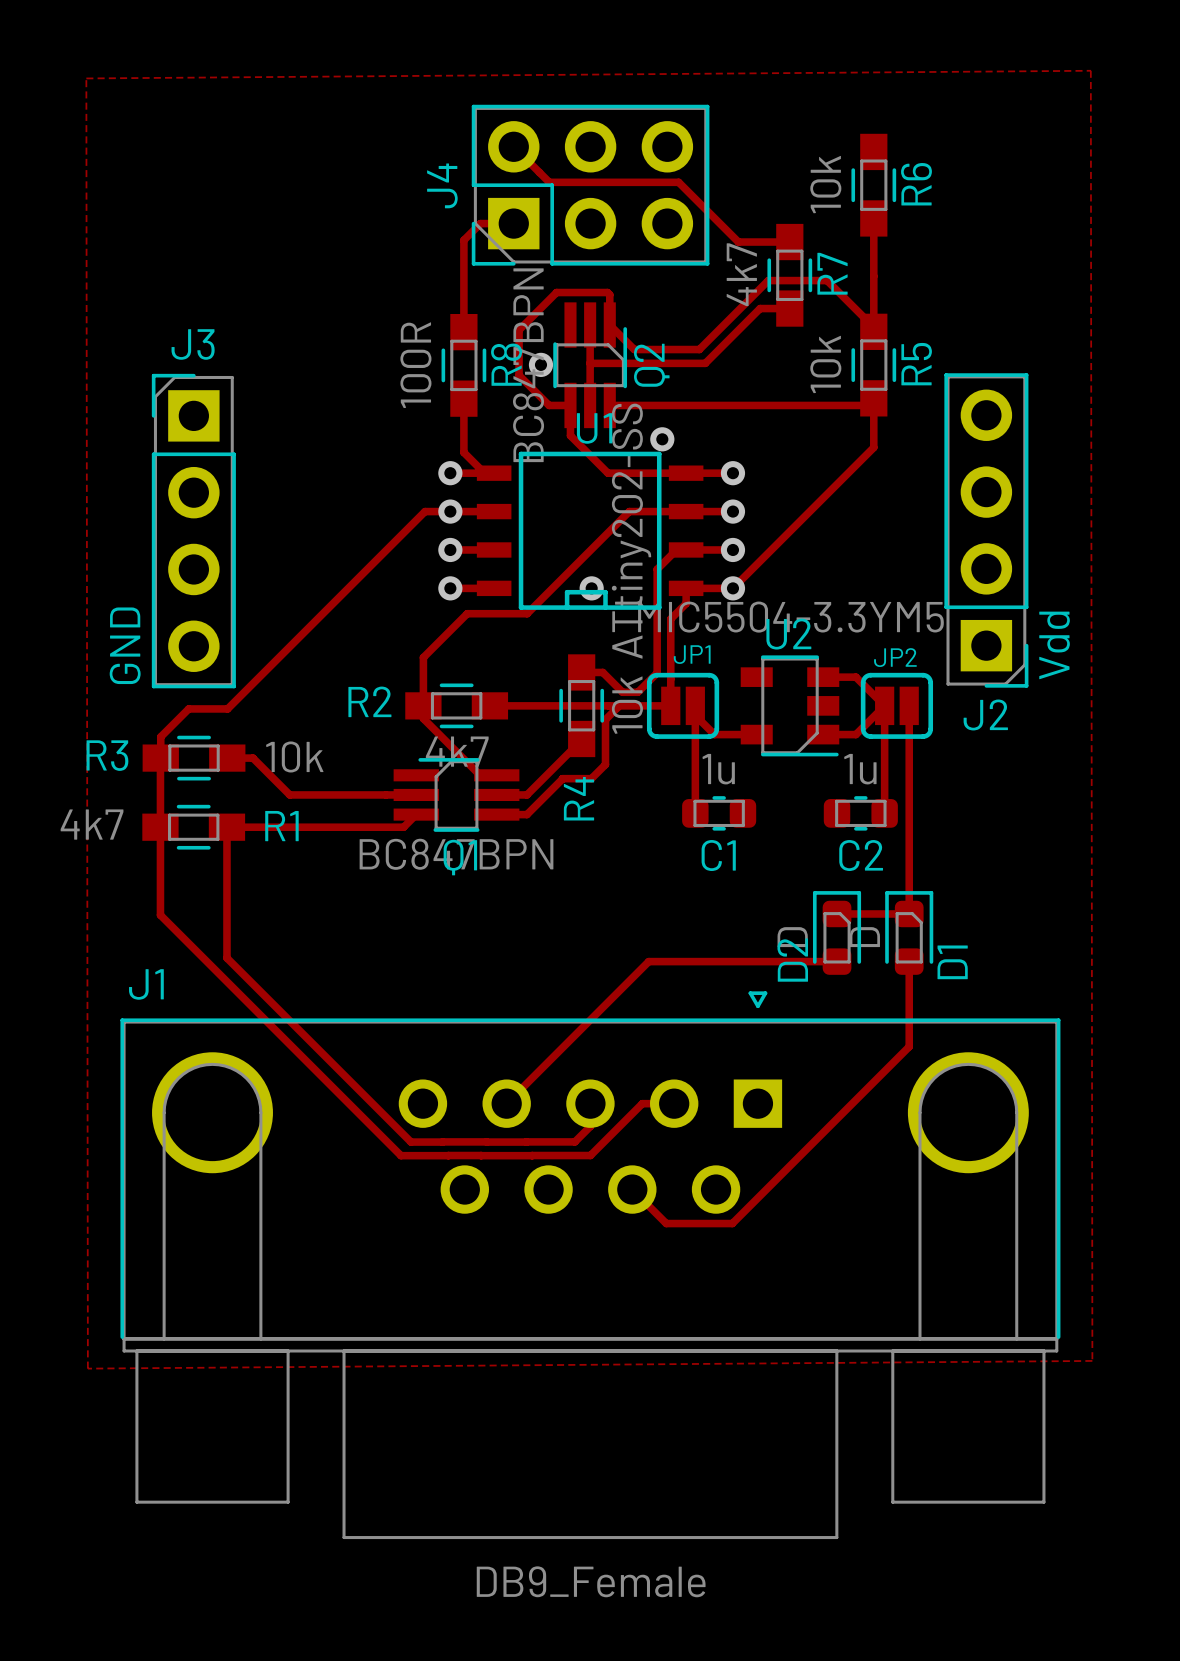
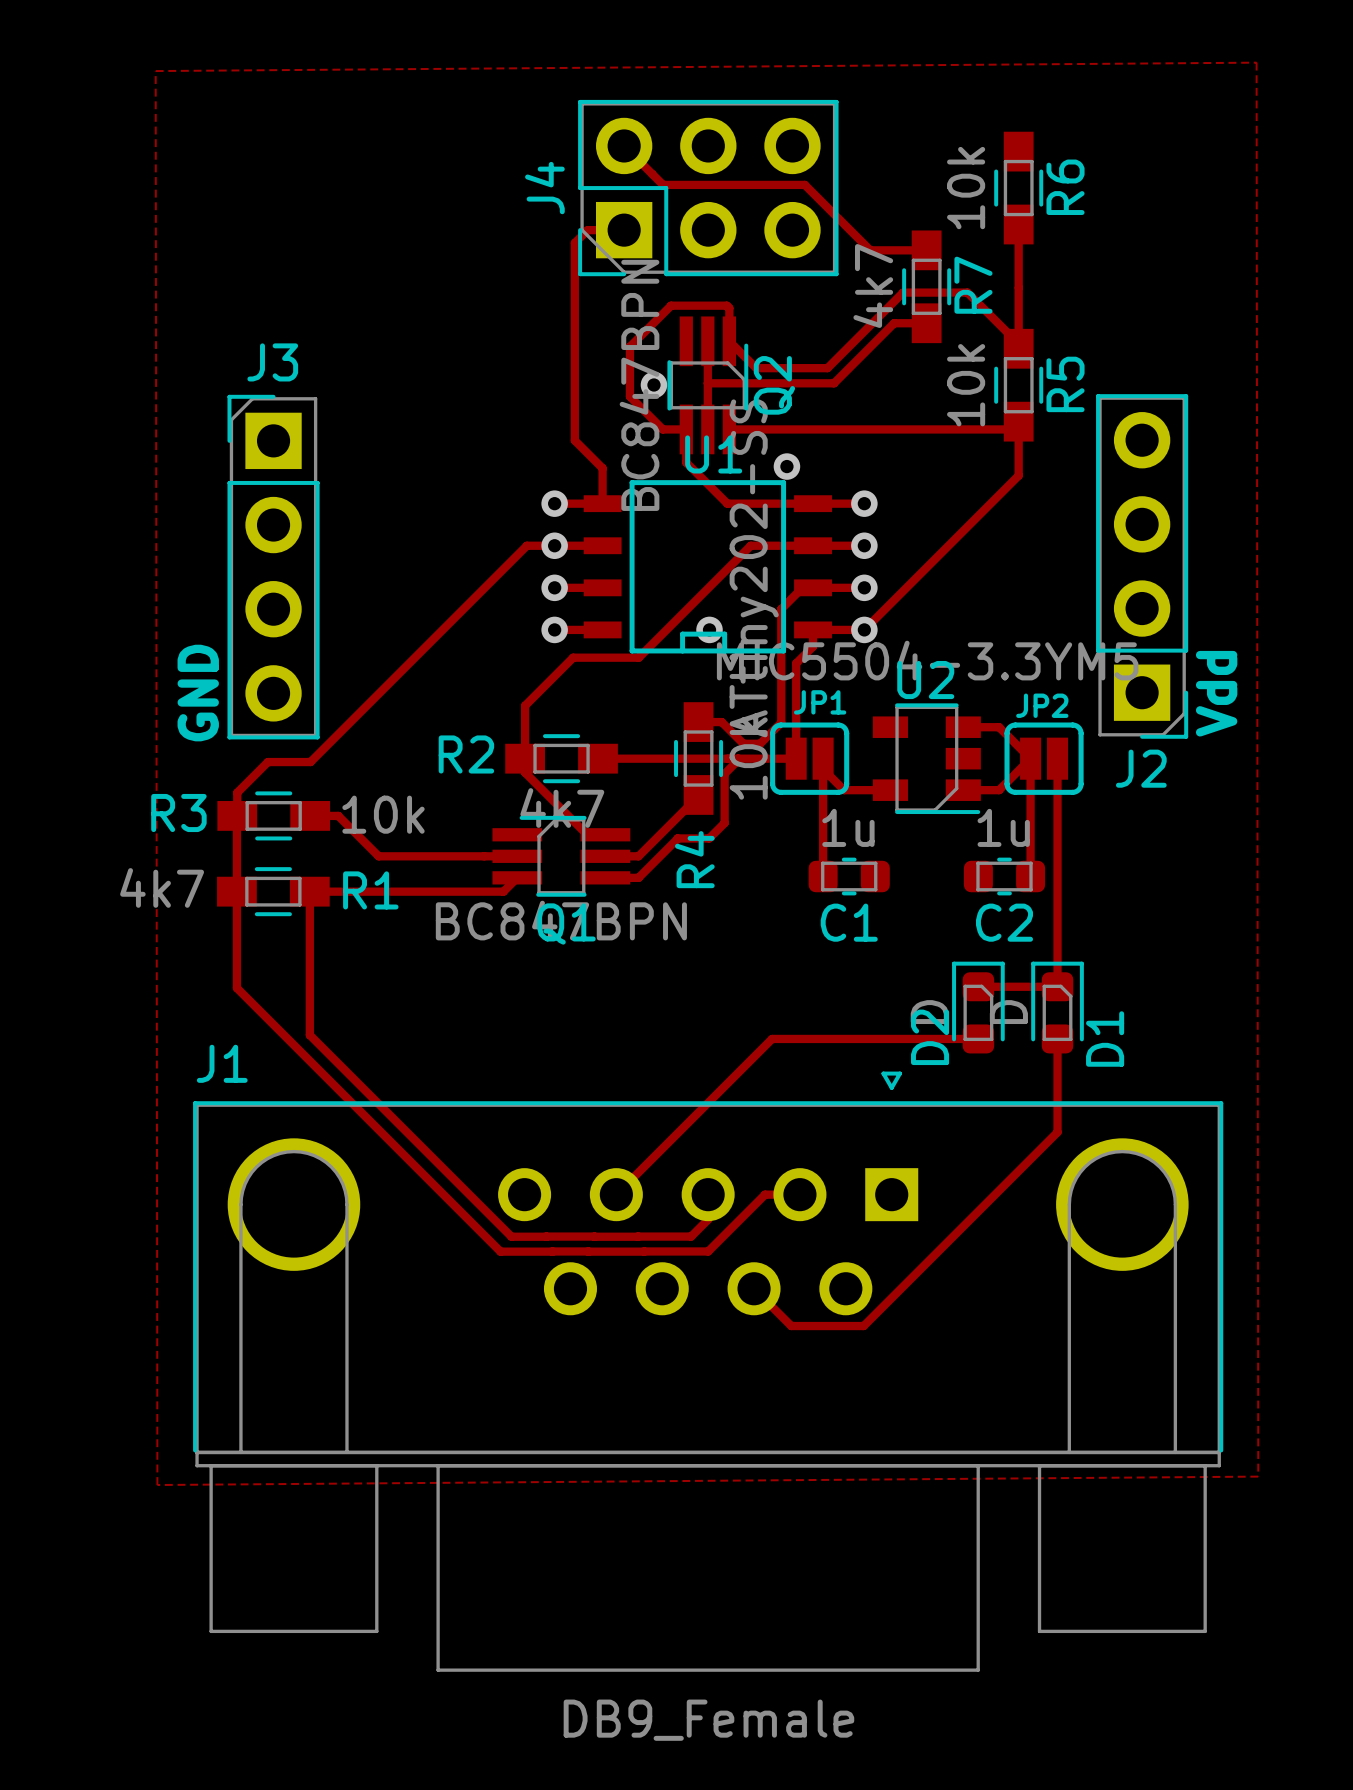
track: (468, 235) (463, 240) (463, 332) -> (574, 243) (574, 440) (602, 468) (602, 503)
R8: 100R (463, 365) -> none
track: (463, 398) (463, 452) (484, 473) -> none

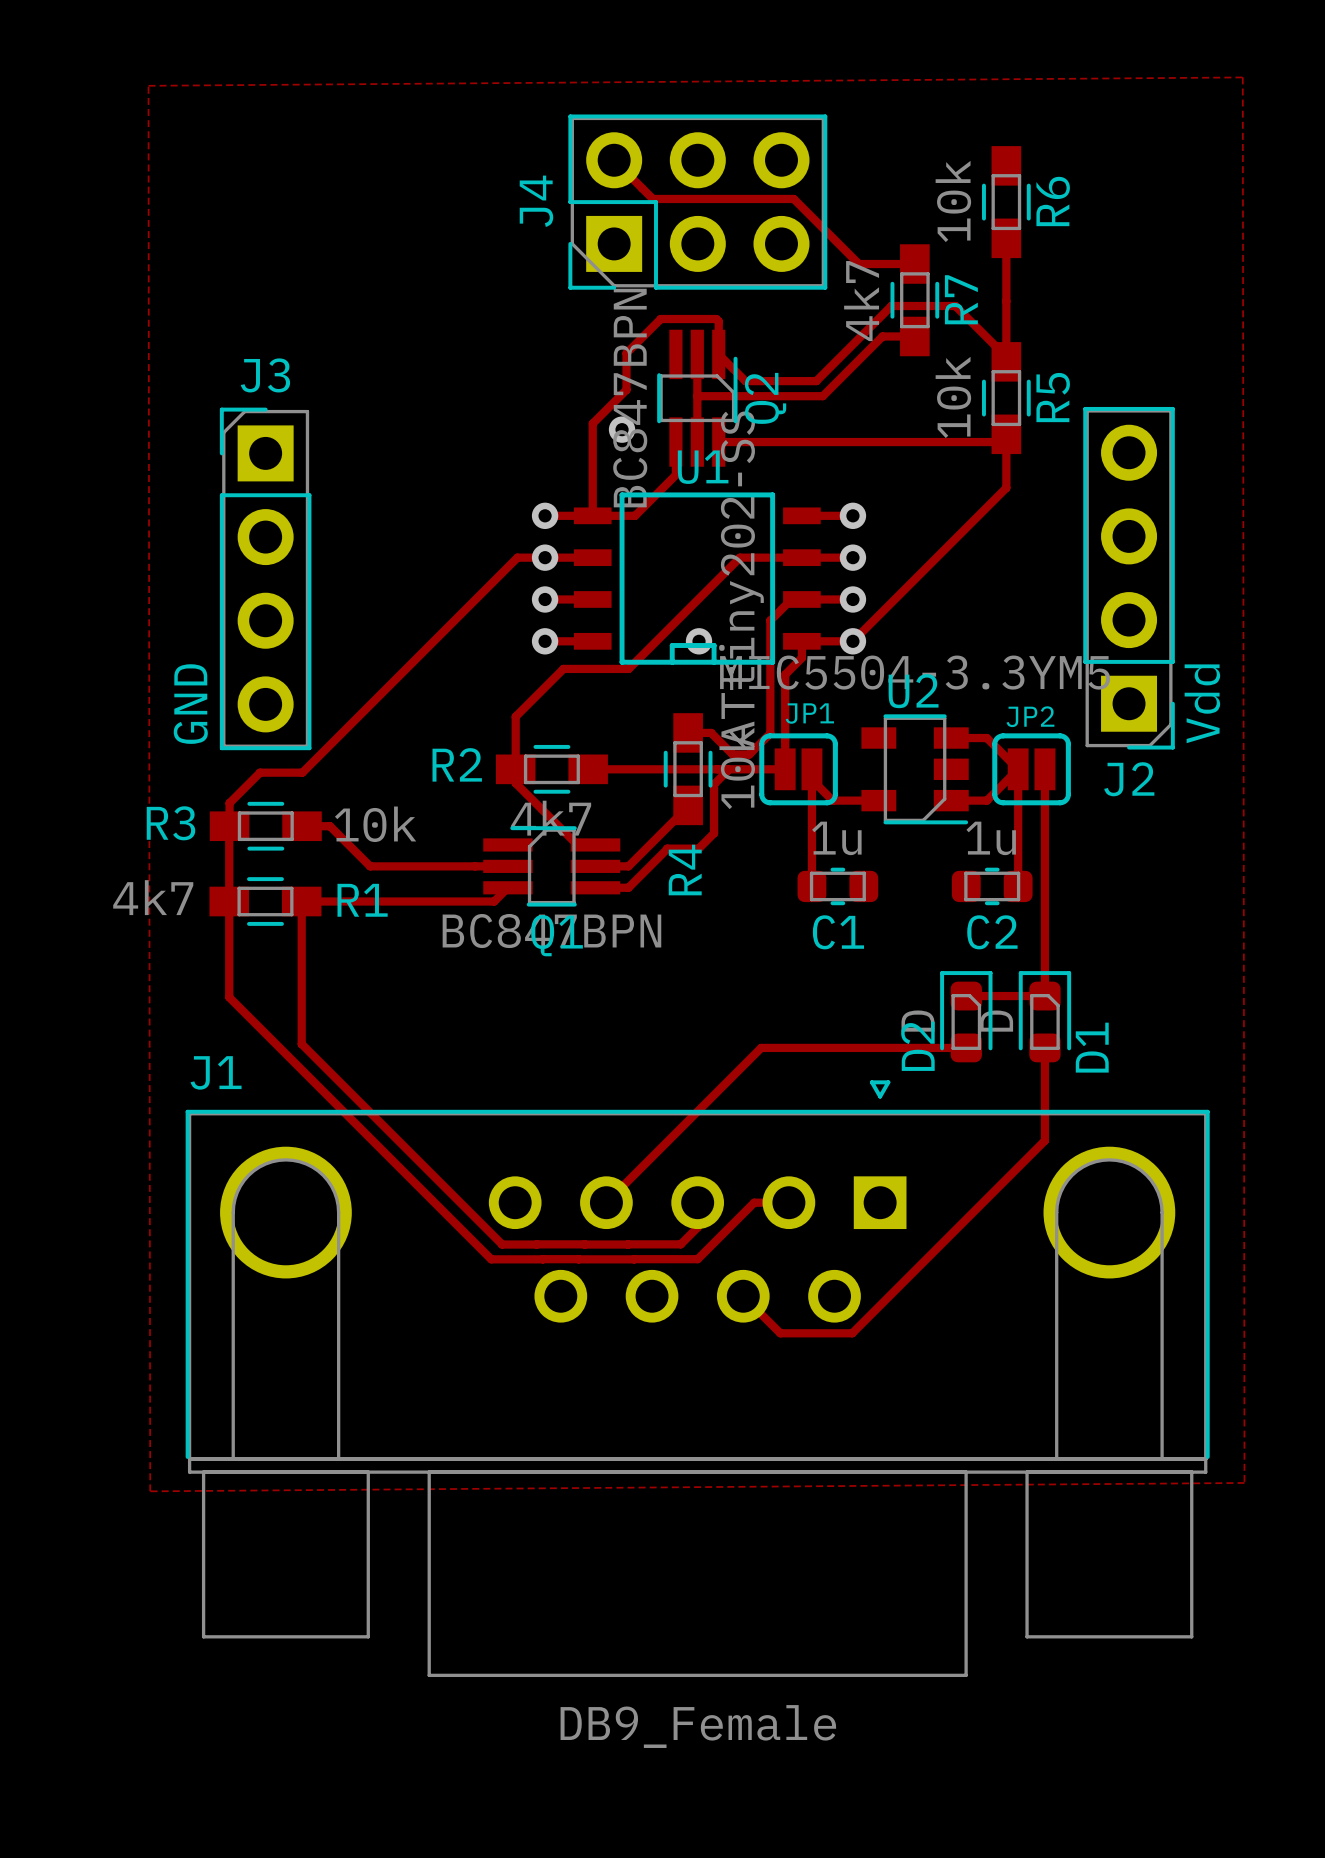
track: (624, 230) (587, 230) (574, 243) (574, 440) (602, 468) -> none
track: (636, 340) (629, 346) (629, 396) (662, 429) (686, 429) -> (626, 353) (626, 389) (592, 423) (592, 480)
via position: (653, 384) -> (622, 429)
track: (686, 462) (727, 503) (813, 503) -> (675, 474) (635, 515) (592, 515)
via: (786, 466) -> none

